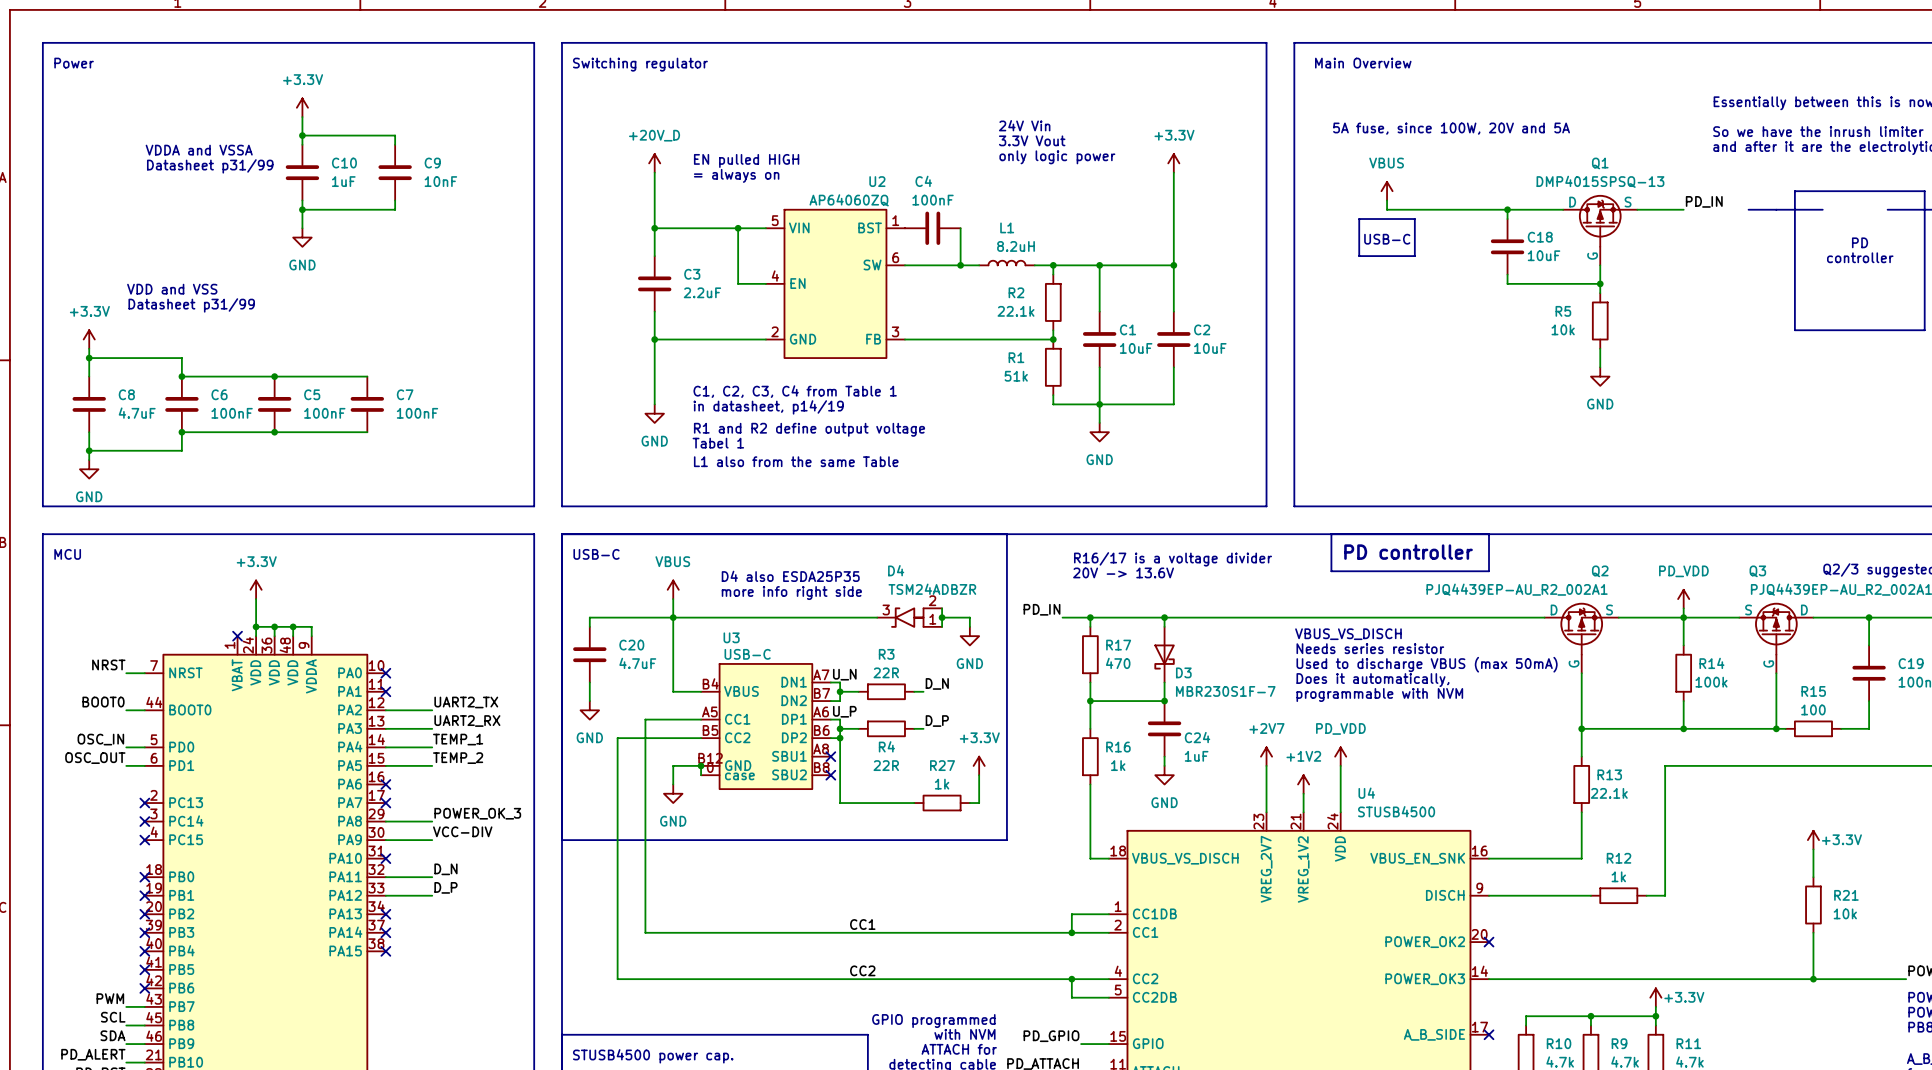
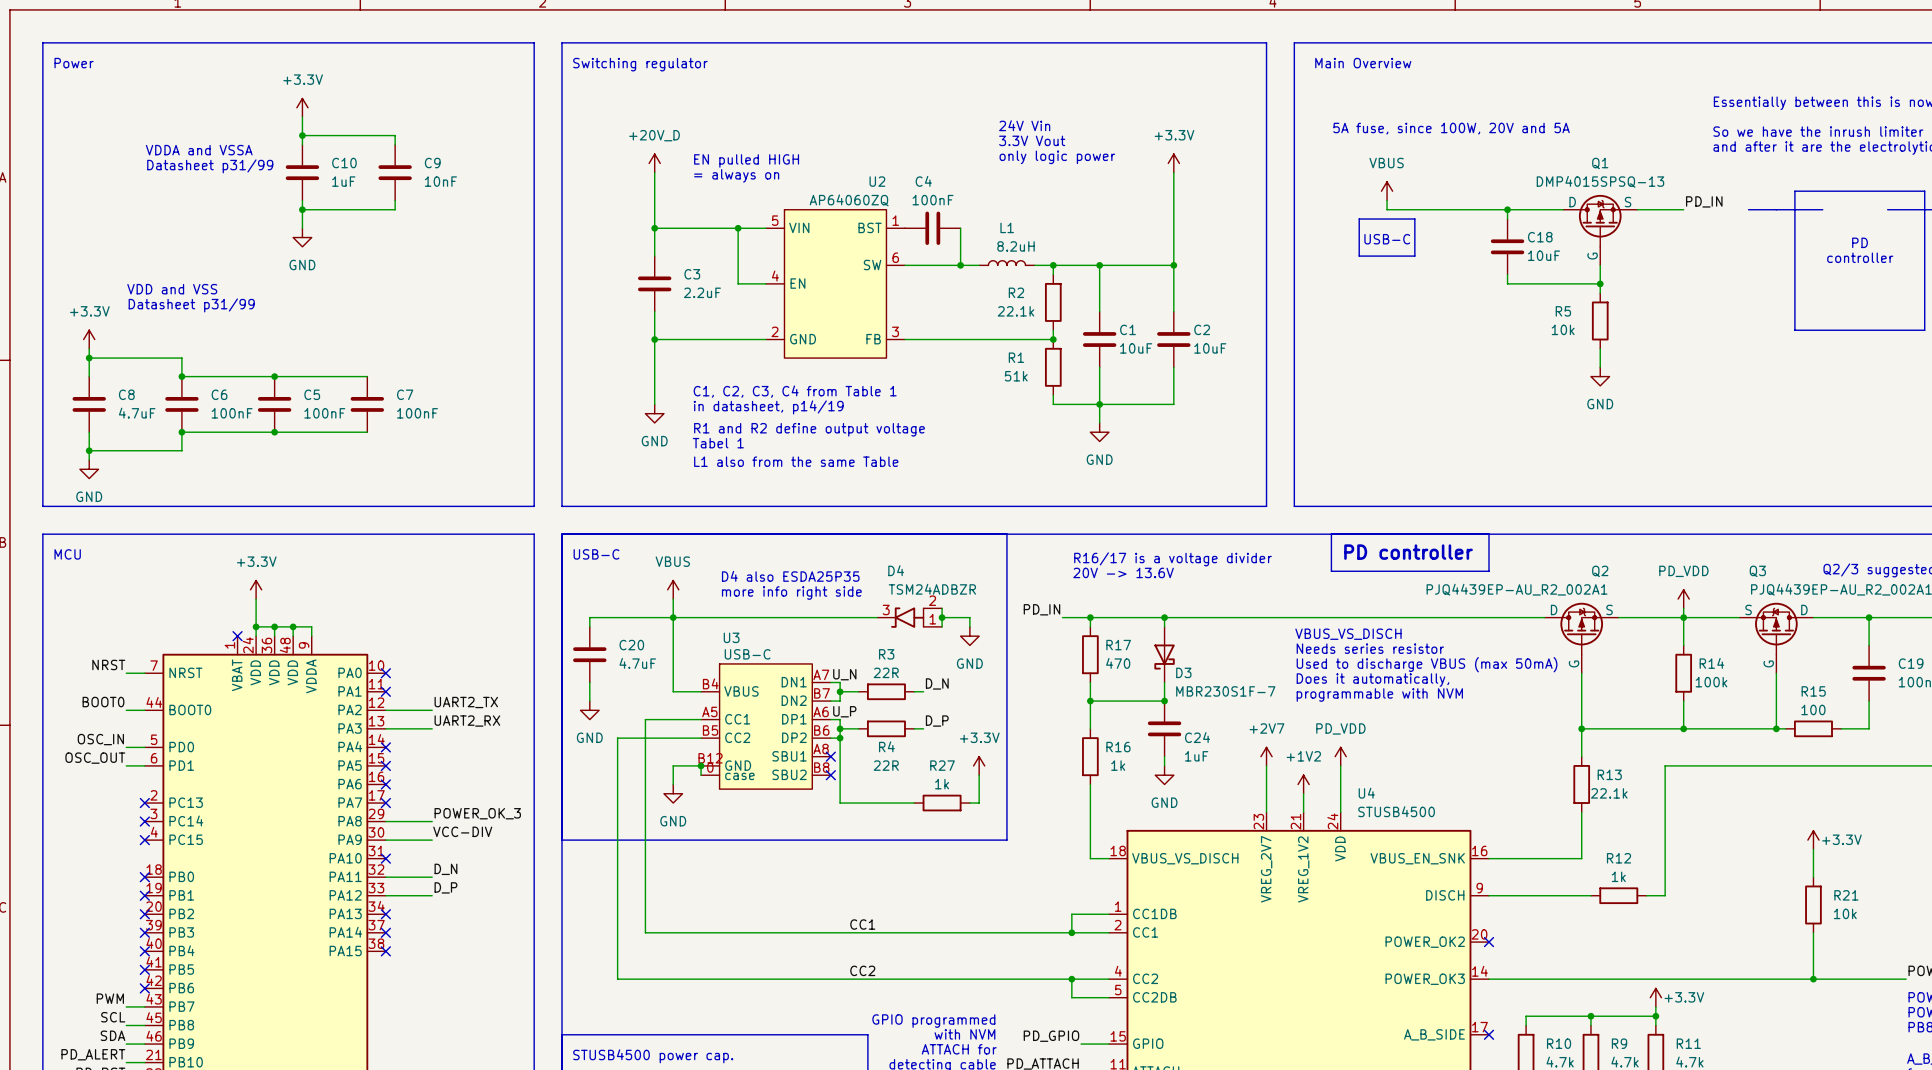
label: TEMP_1 (458, 739) -> none
wire: (385, 747) (432, 747) -> none
no-connect mark: none -> (385, 747)
label: TEMP_2 (458, 758) -> none
wire: (385, 765) (432, 765) -> none
no-connect mark: none -> (385, 765)

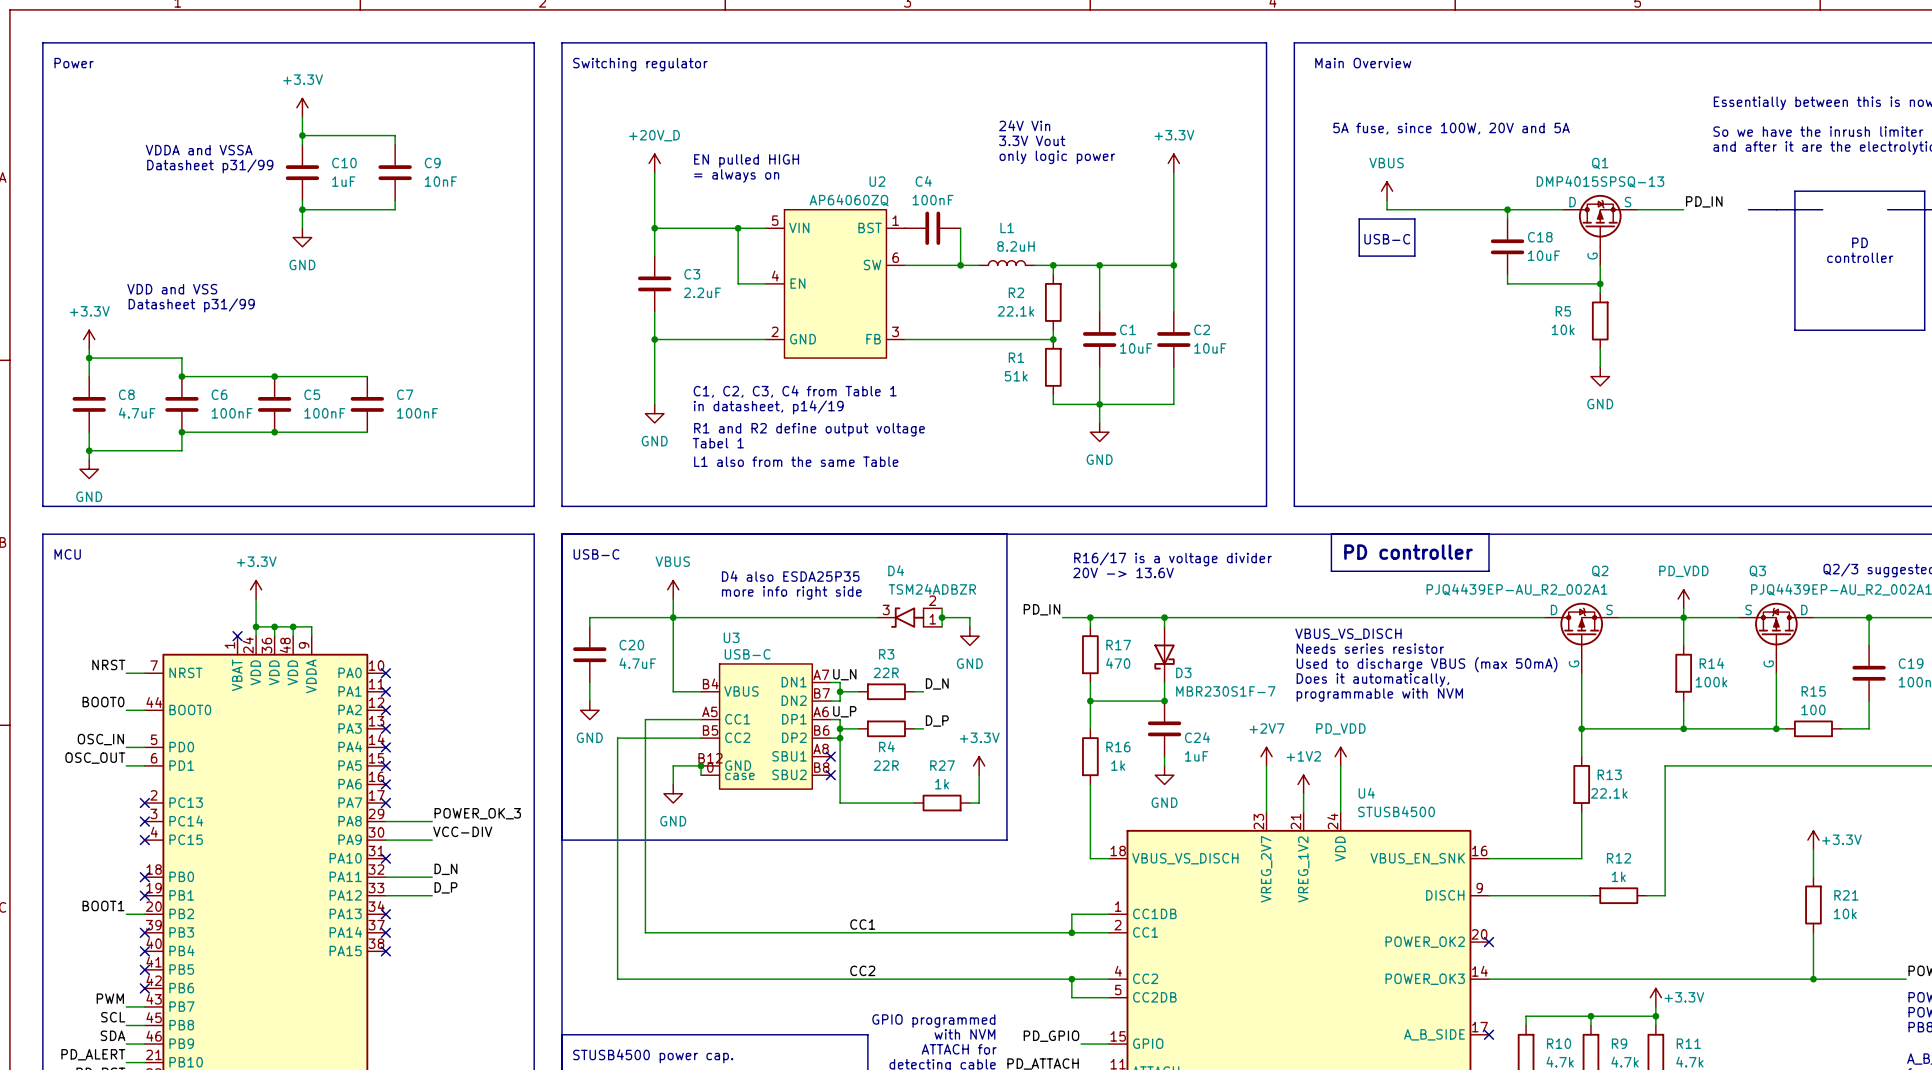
label: UART2_TX (466, 702) -> none
wire: (385, 710) (432, 710) -> none
no-connect mark: none -> (385, 710)
label: UART2_RX (467, 721) -> none
wire: (385, 728) (432, 728) -> none
no-connect mark: none -> (385, 728)
label: none -> BOOT1 (103, 905)
wire: none -> (126, 914) (144, 914)
no-connect mark: (144, 914) -> none

